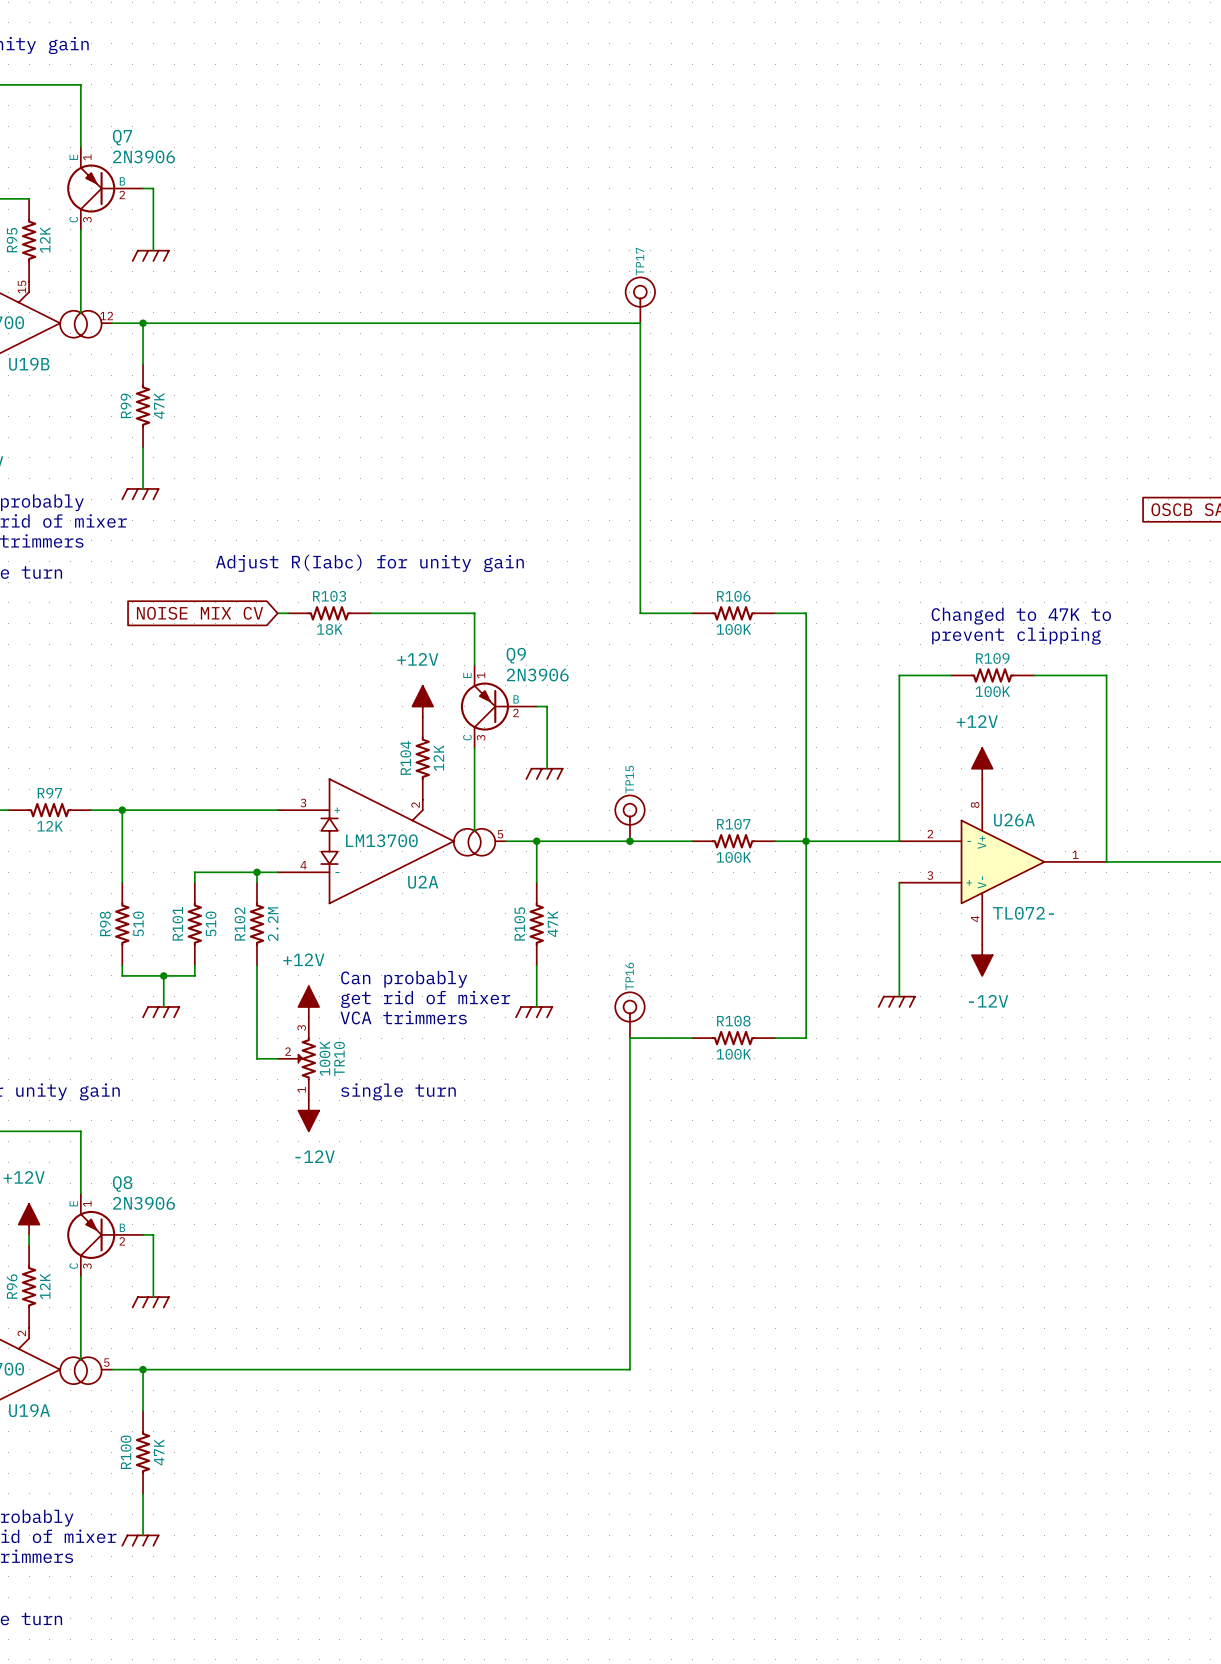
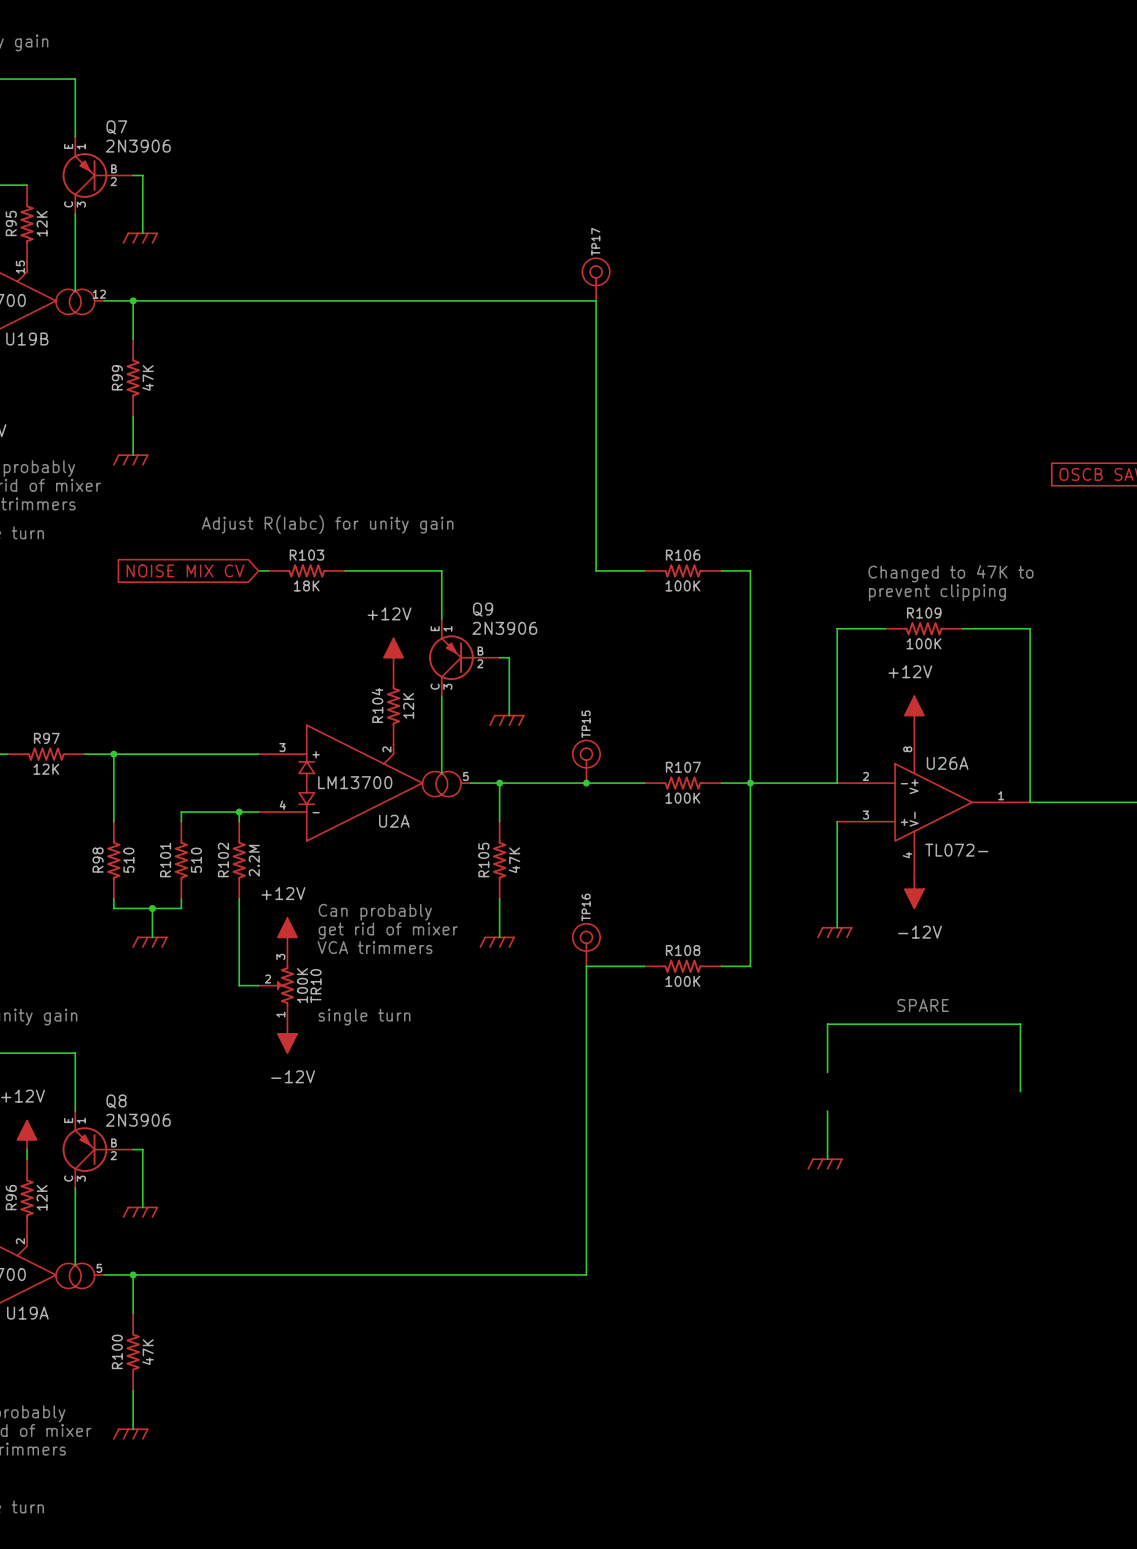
text: none -> SPARE (923, 1005)
wire: none -> (827, 1072) (827, 1024) (1020, 1024) (1020, 1091)
wire: none -> (827, 1111) (827, 1159)
power symbol: none -> (825, 1164)

